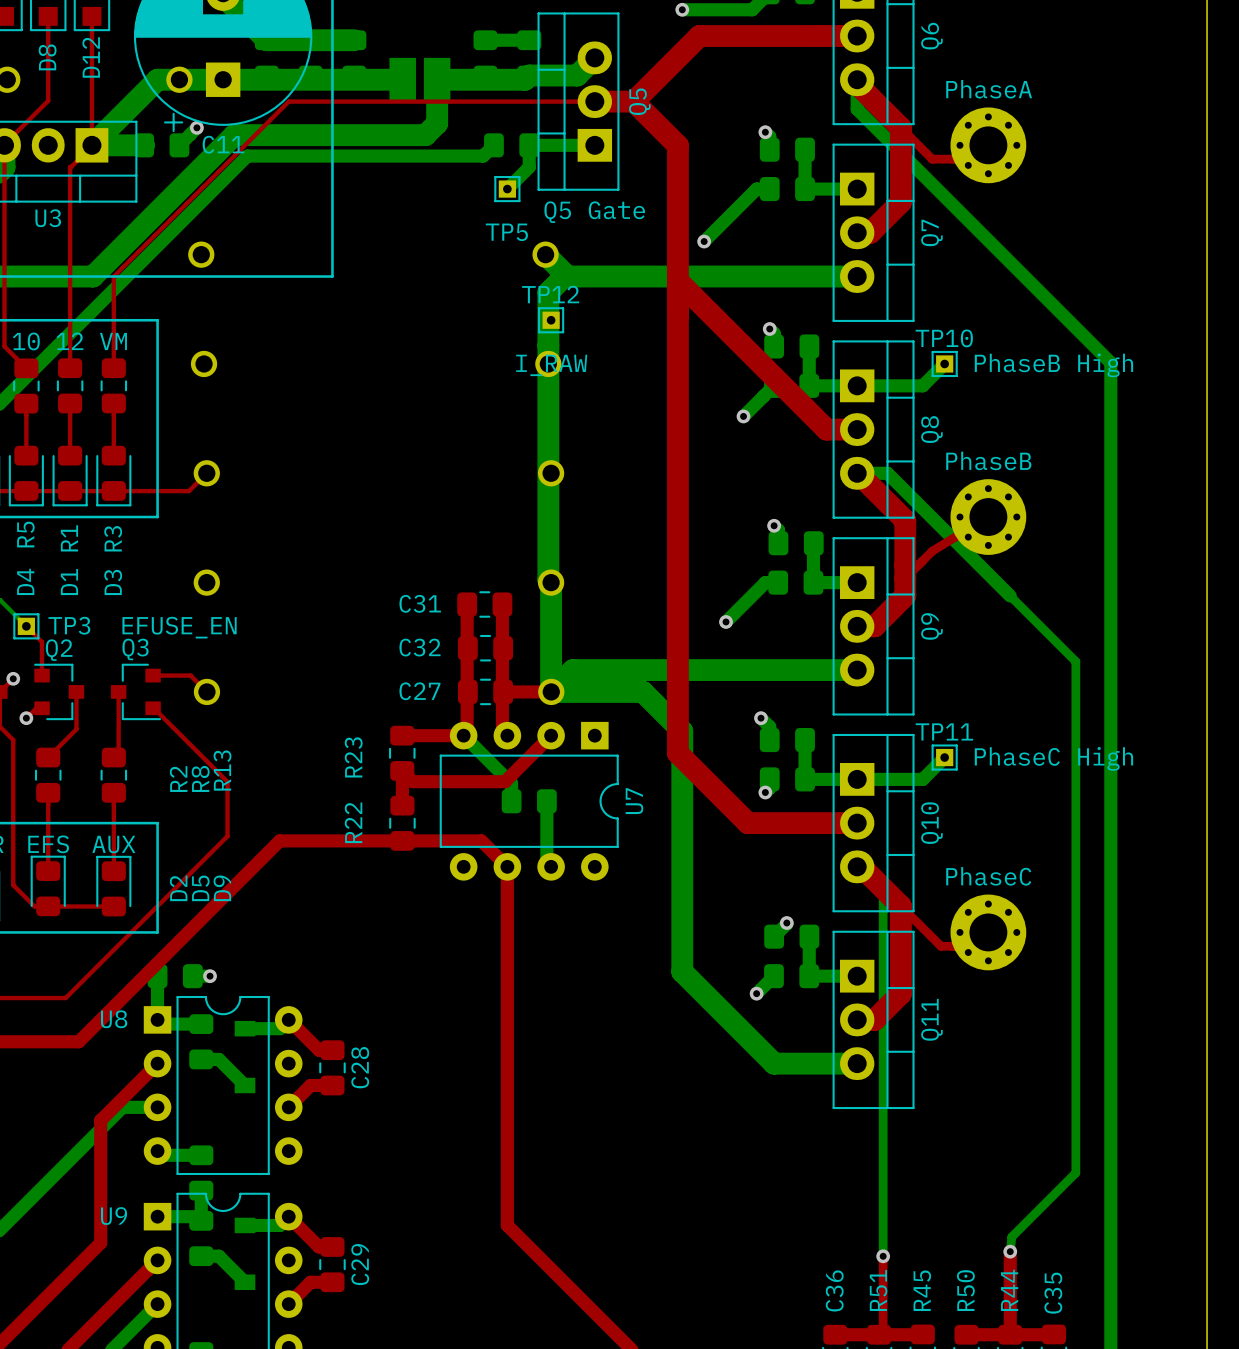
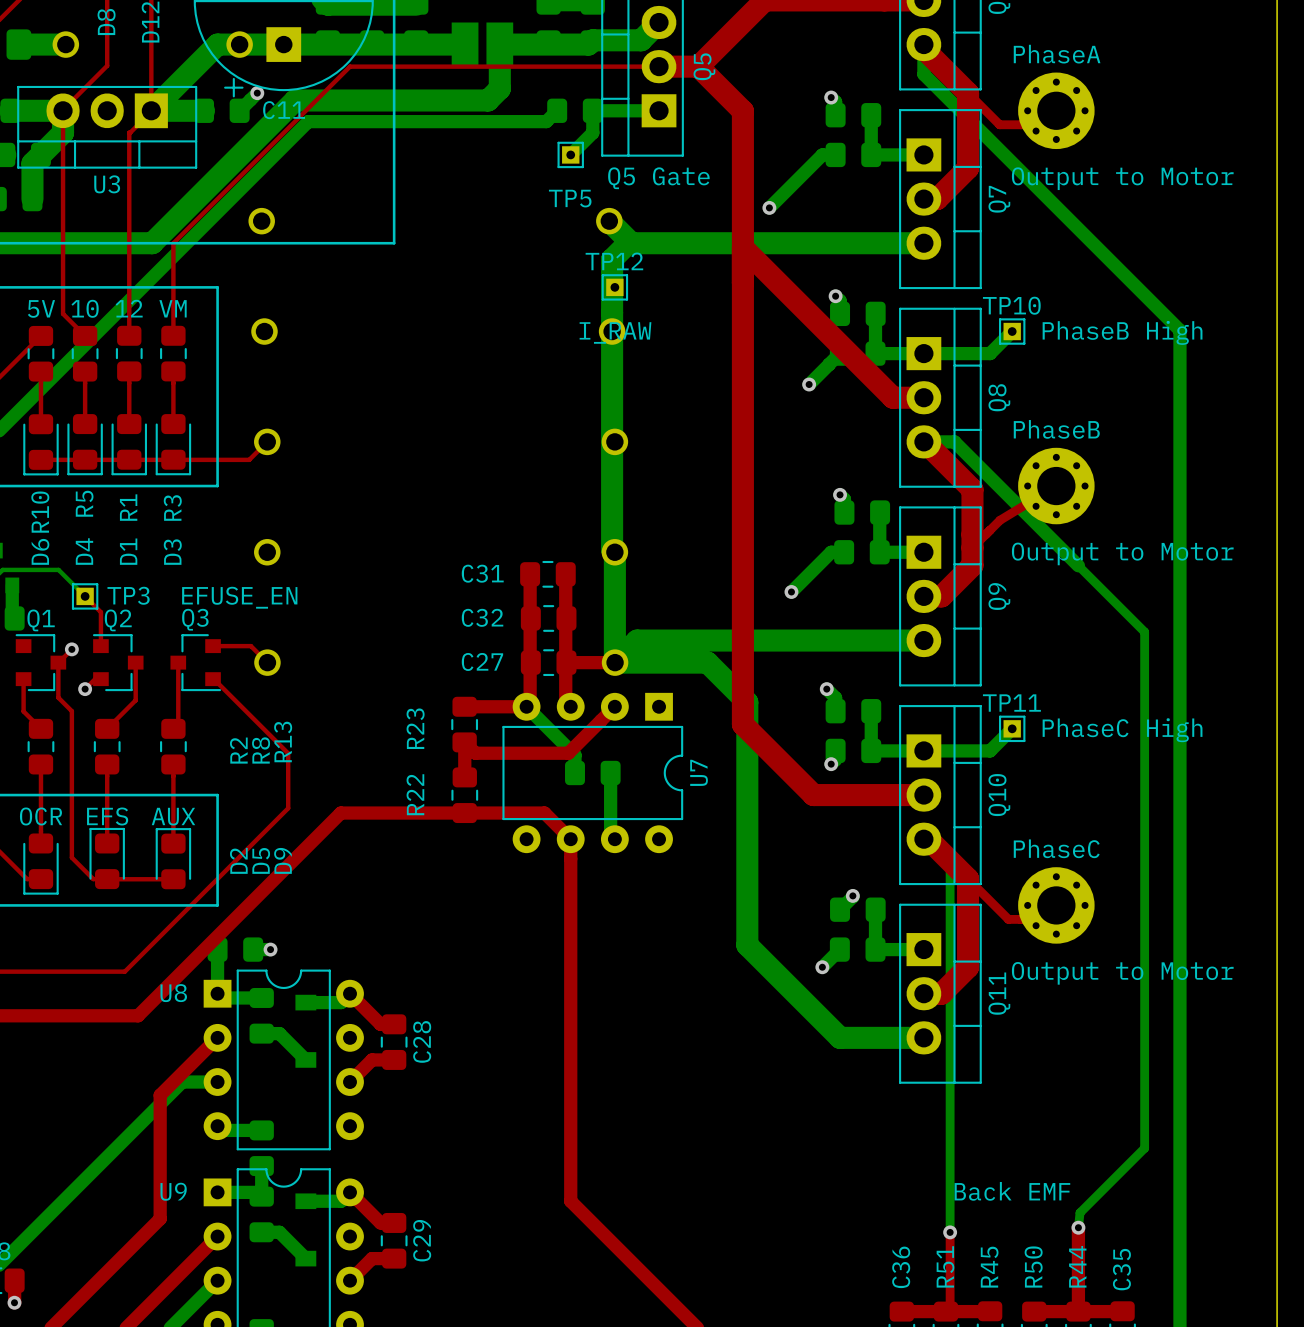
text: none -> Output to Motor (1122, 178)
text: none -> Output to Motor (1122, 553)
text: none -> Output to Motor (1122, 973)
text: none -> Back EMF (1012, 1191)

